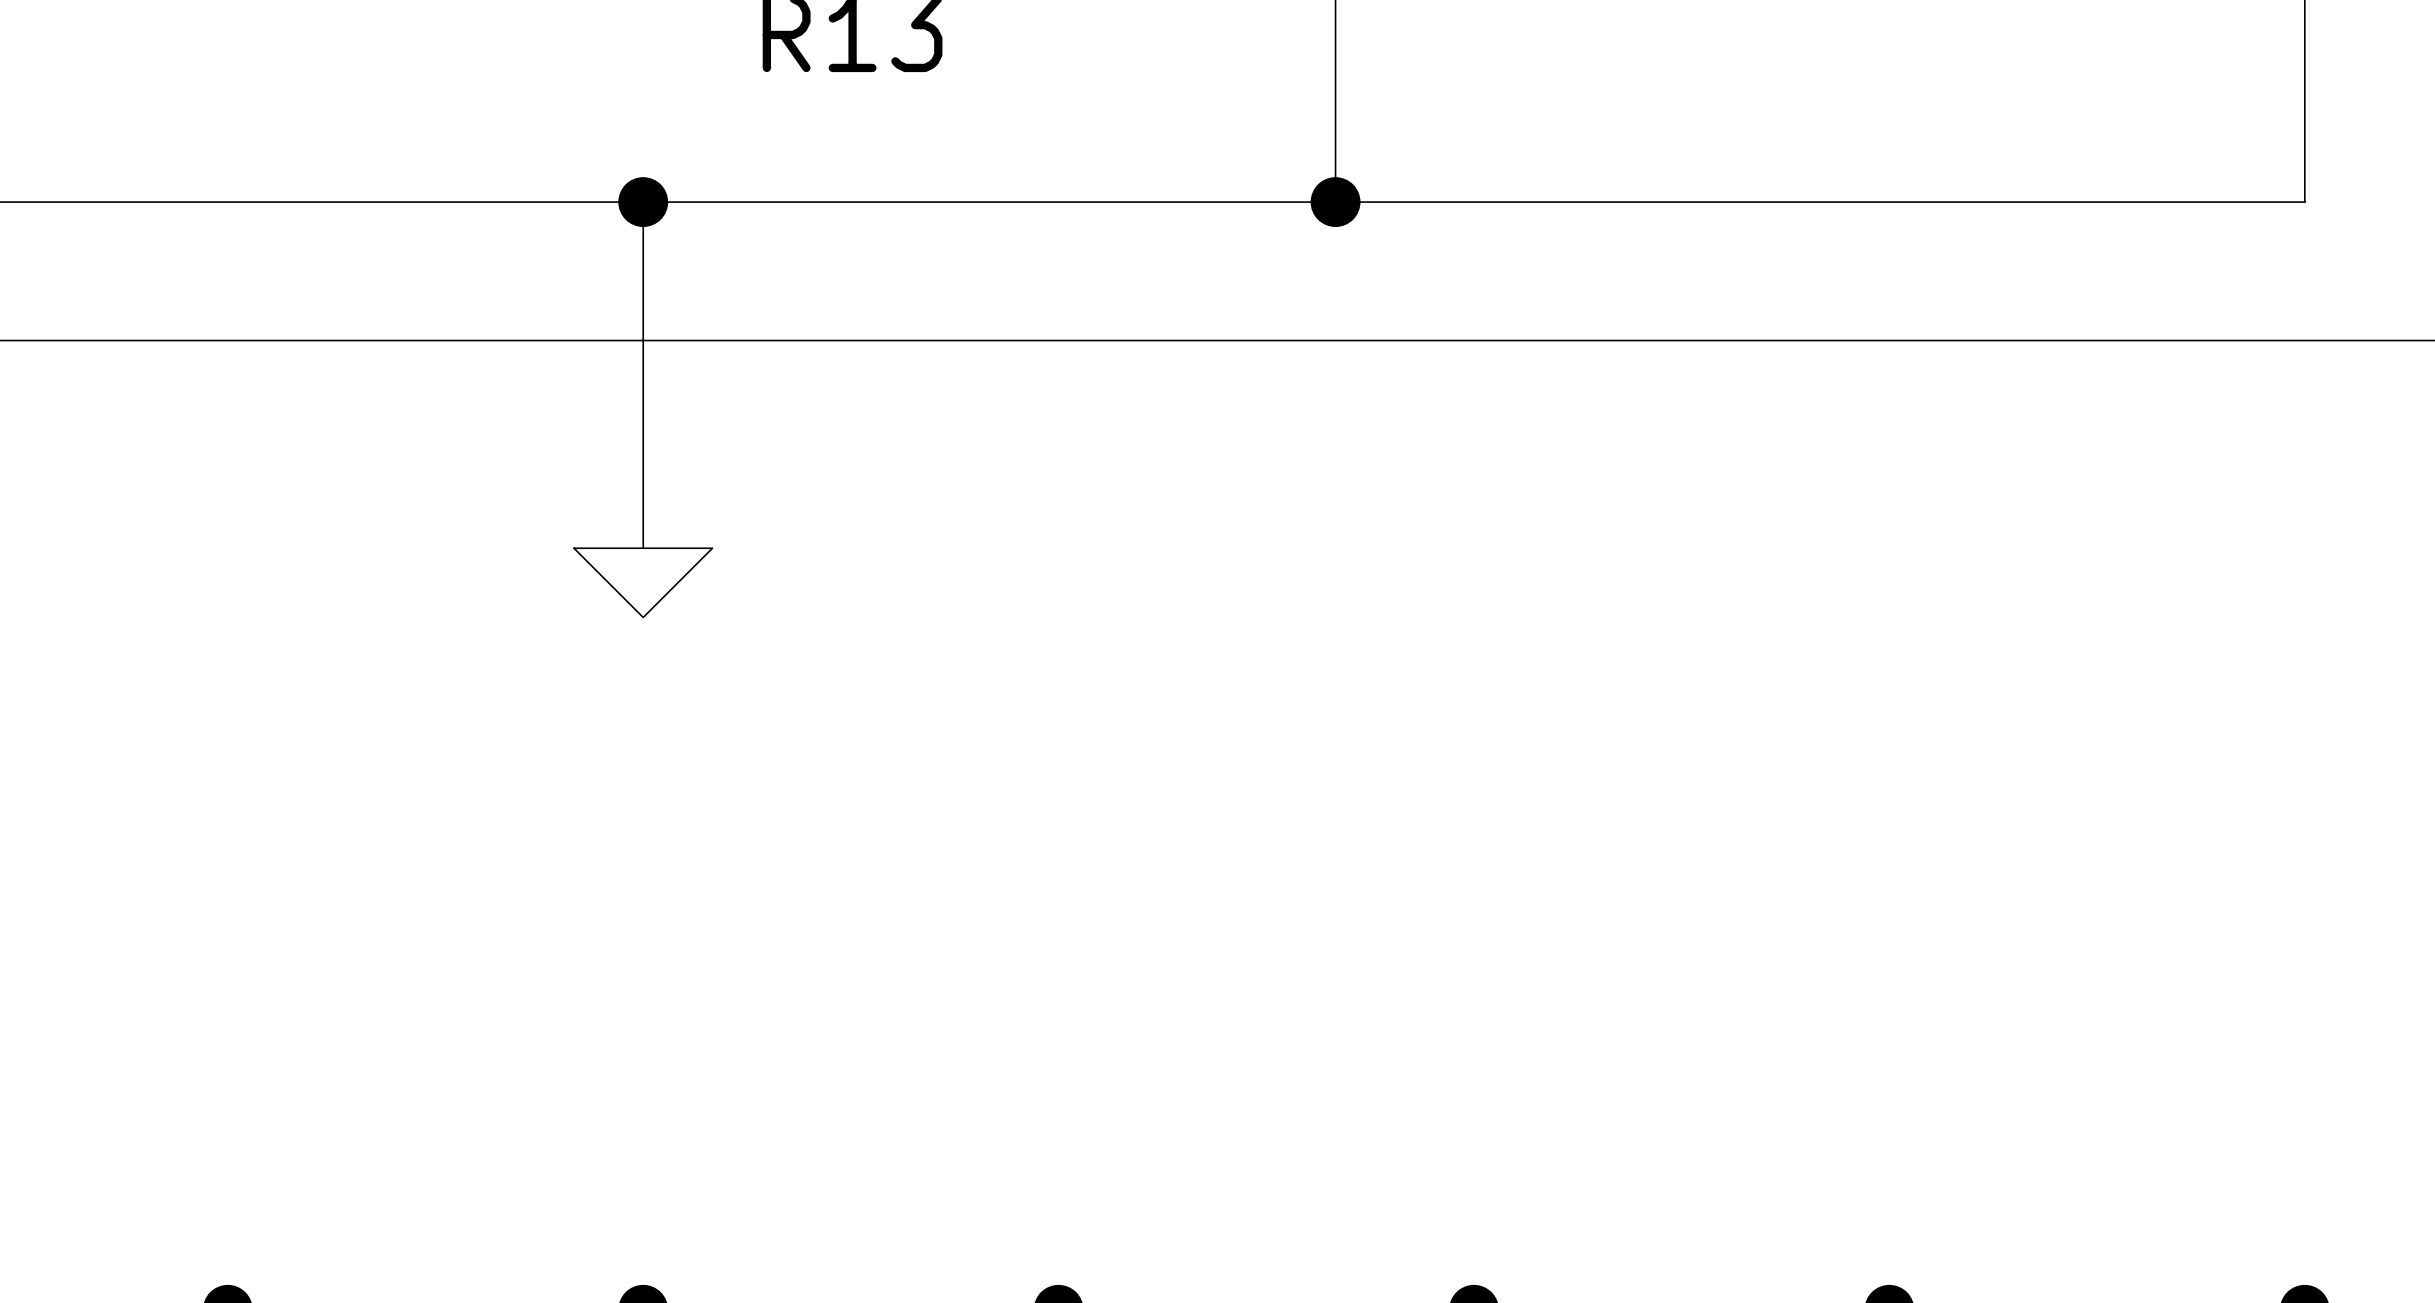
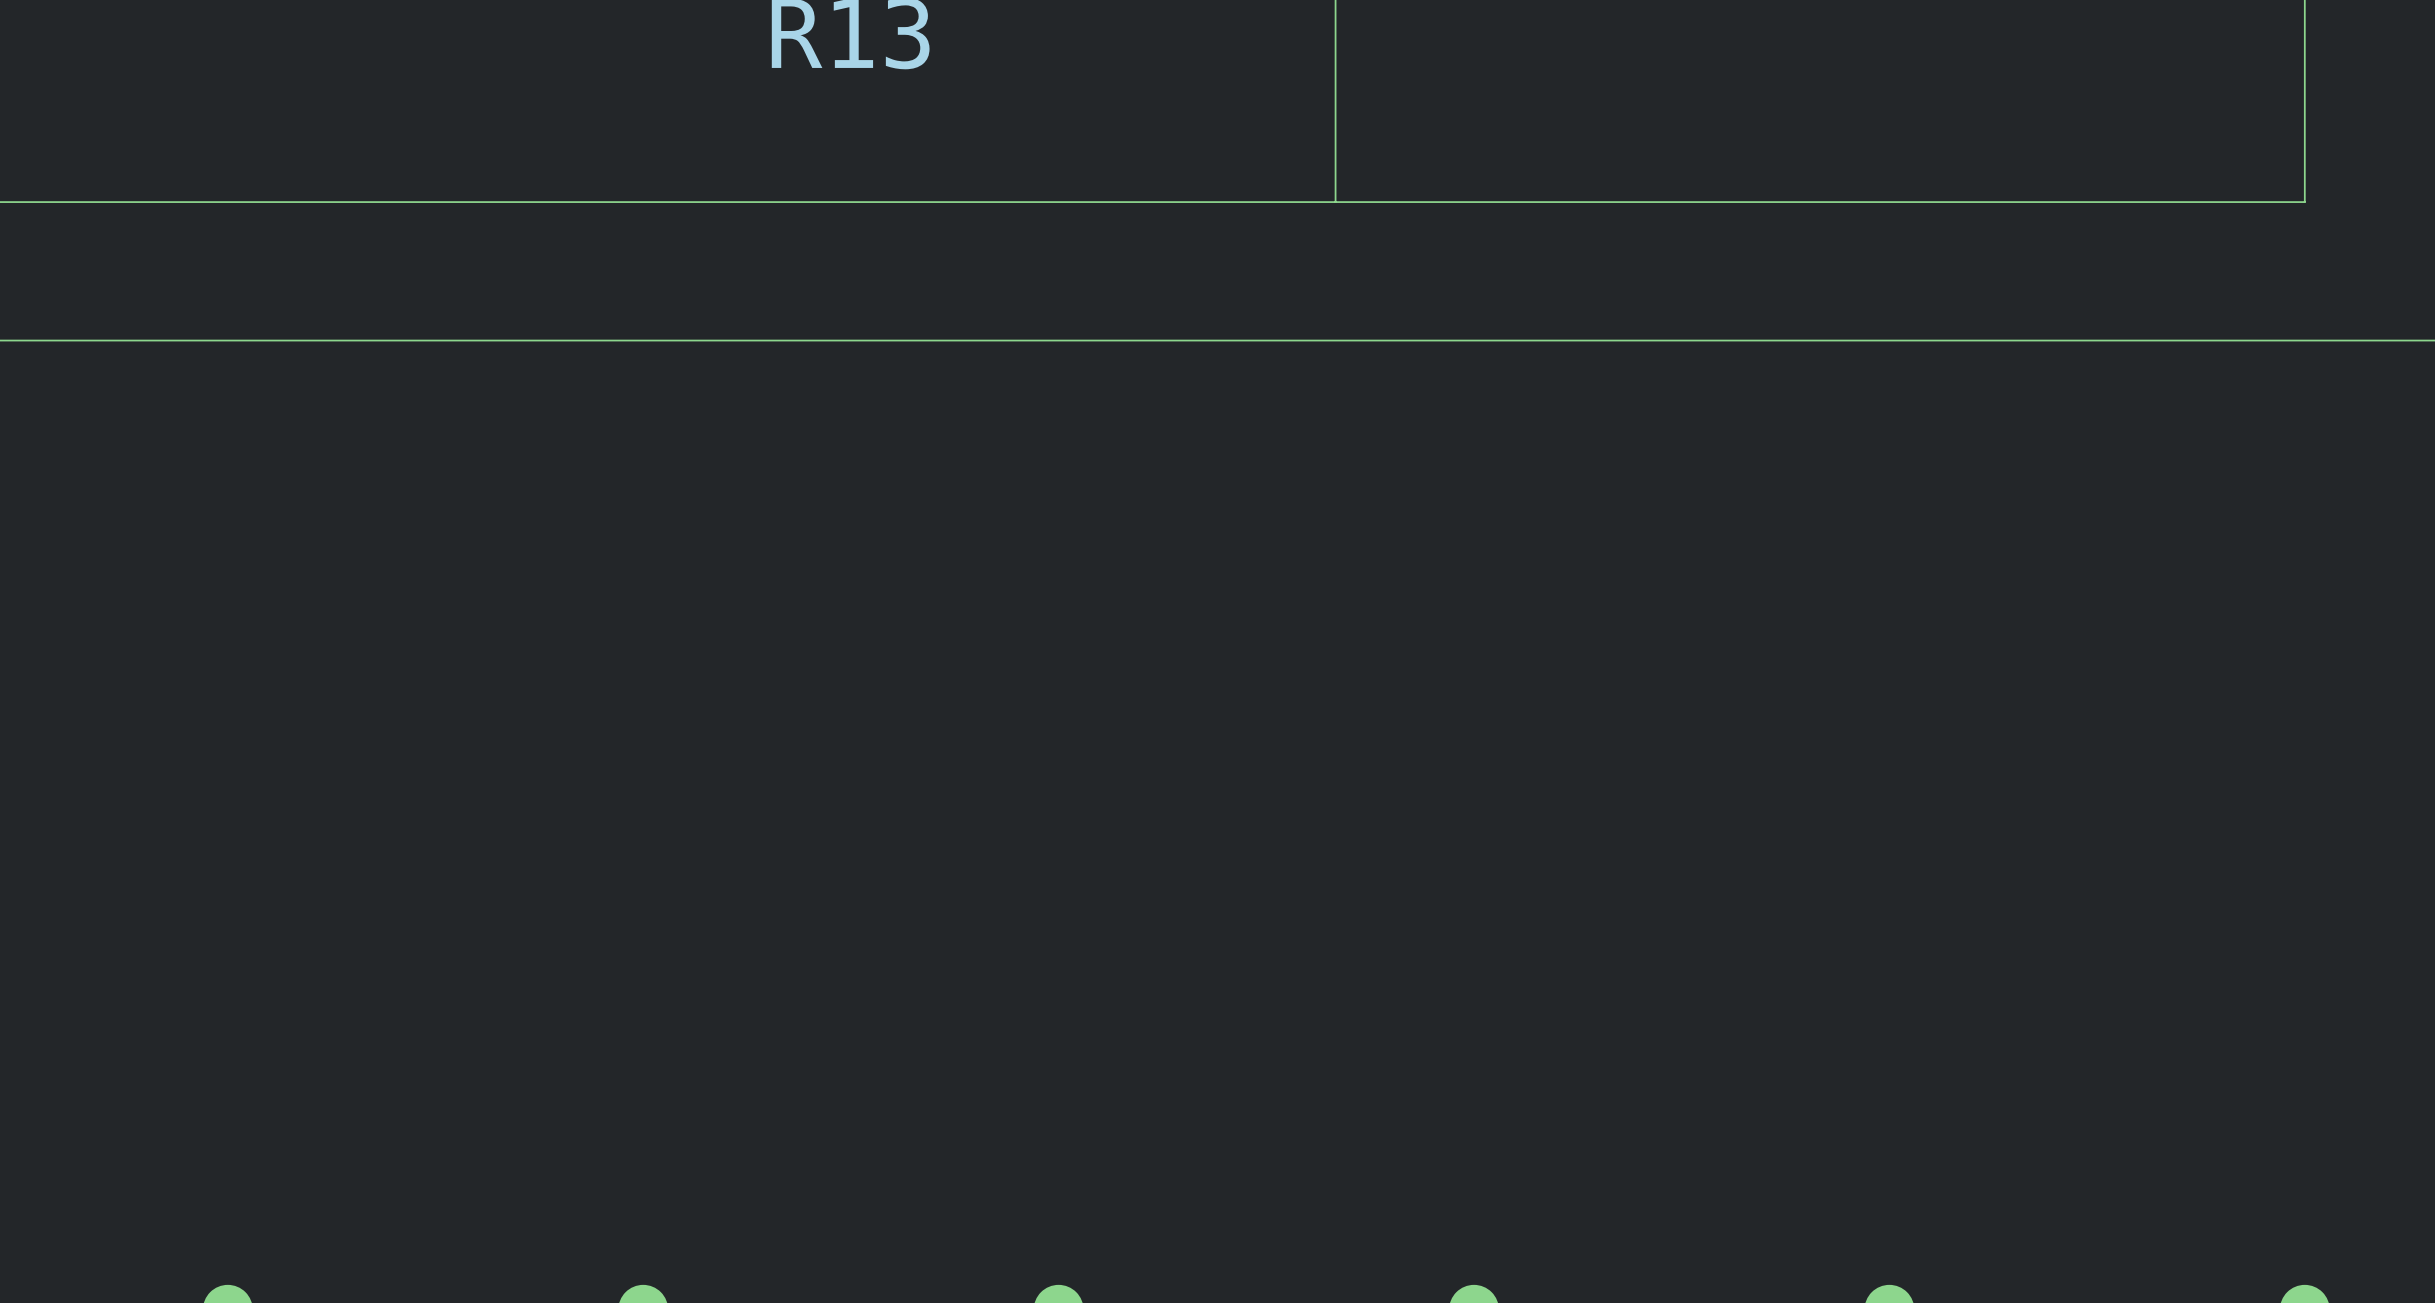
wire: (643, 202) (643, 548) -> none
junction: (643, 202) -> none
junction: (1335, 202) -> none
power symbol: (643, 582) -> none

